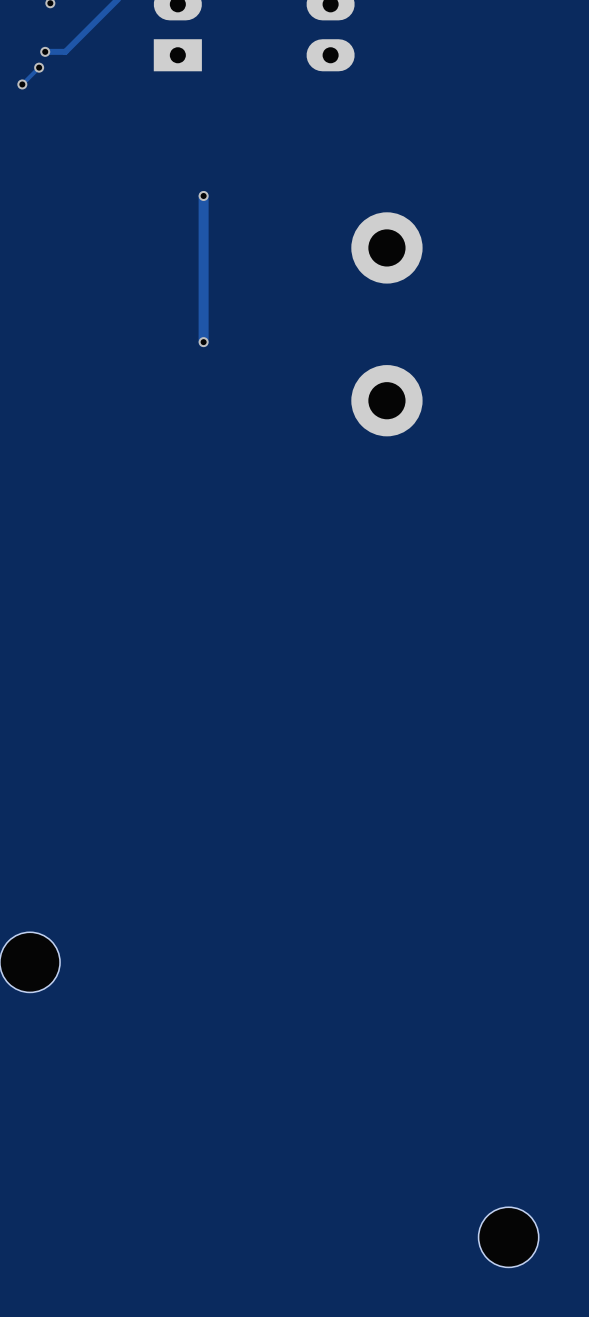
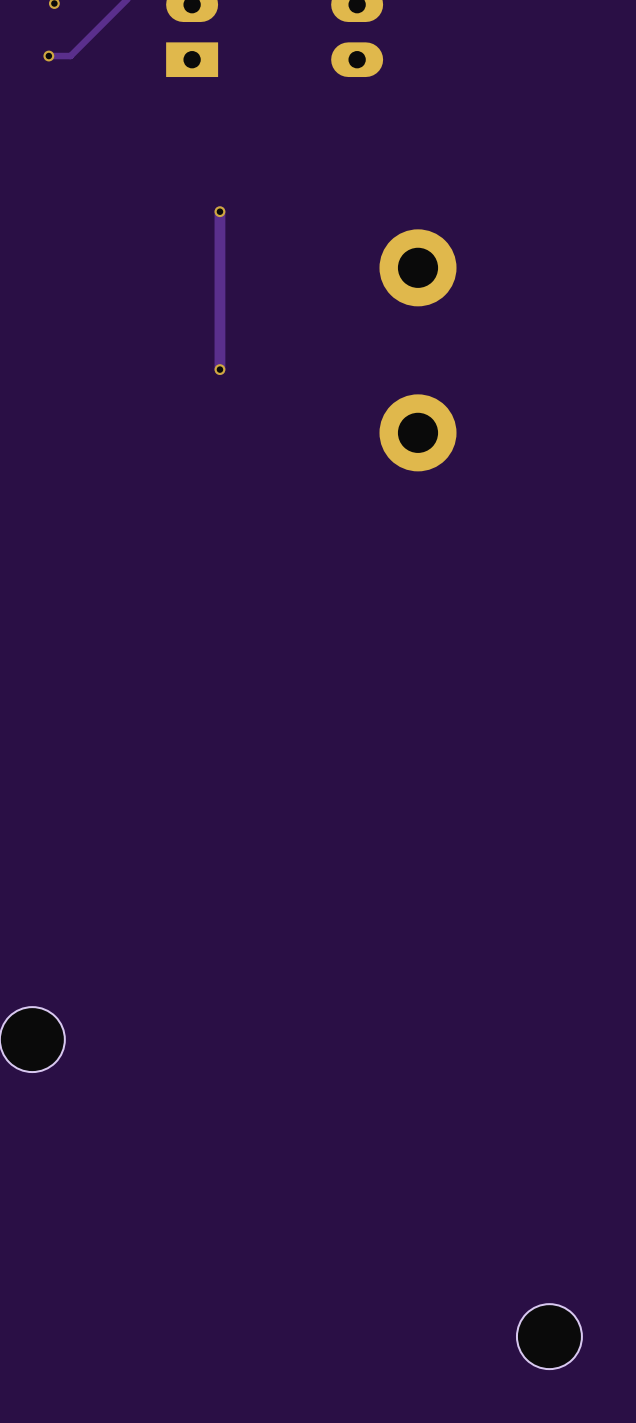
track: (39, 67) (22, 84) -> none
via: (39, 67) -> none
via: (22, 84) -> none

